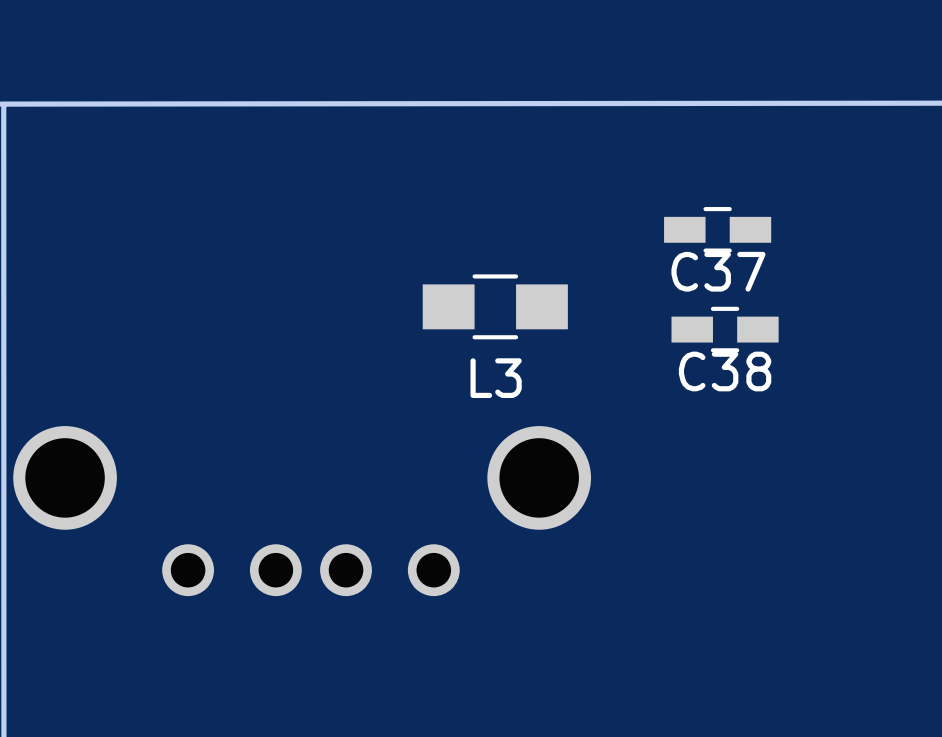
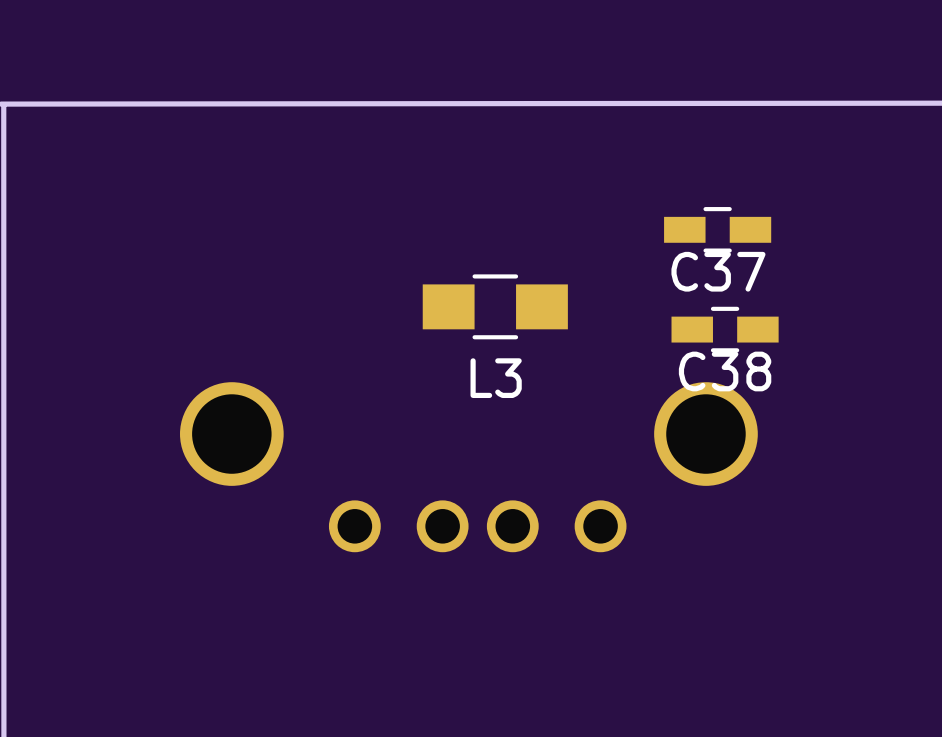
part position: (302, 511) -> (468, 467)

